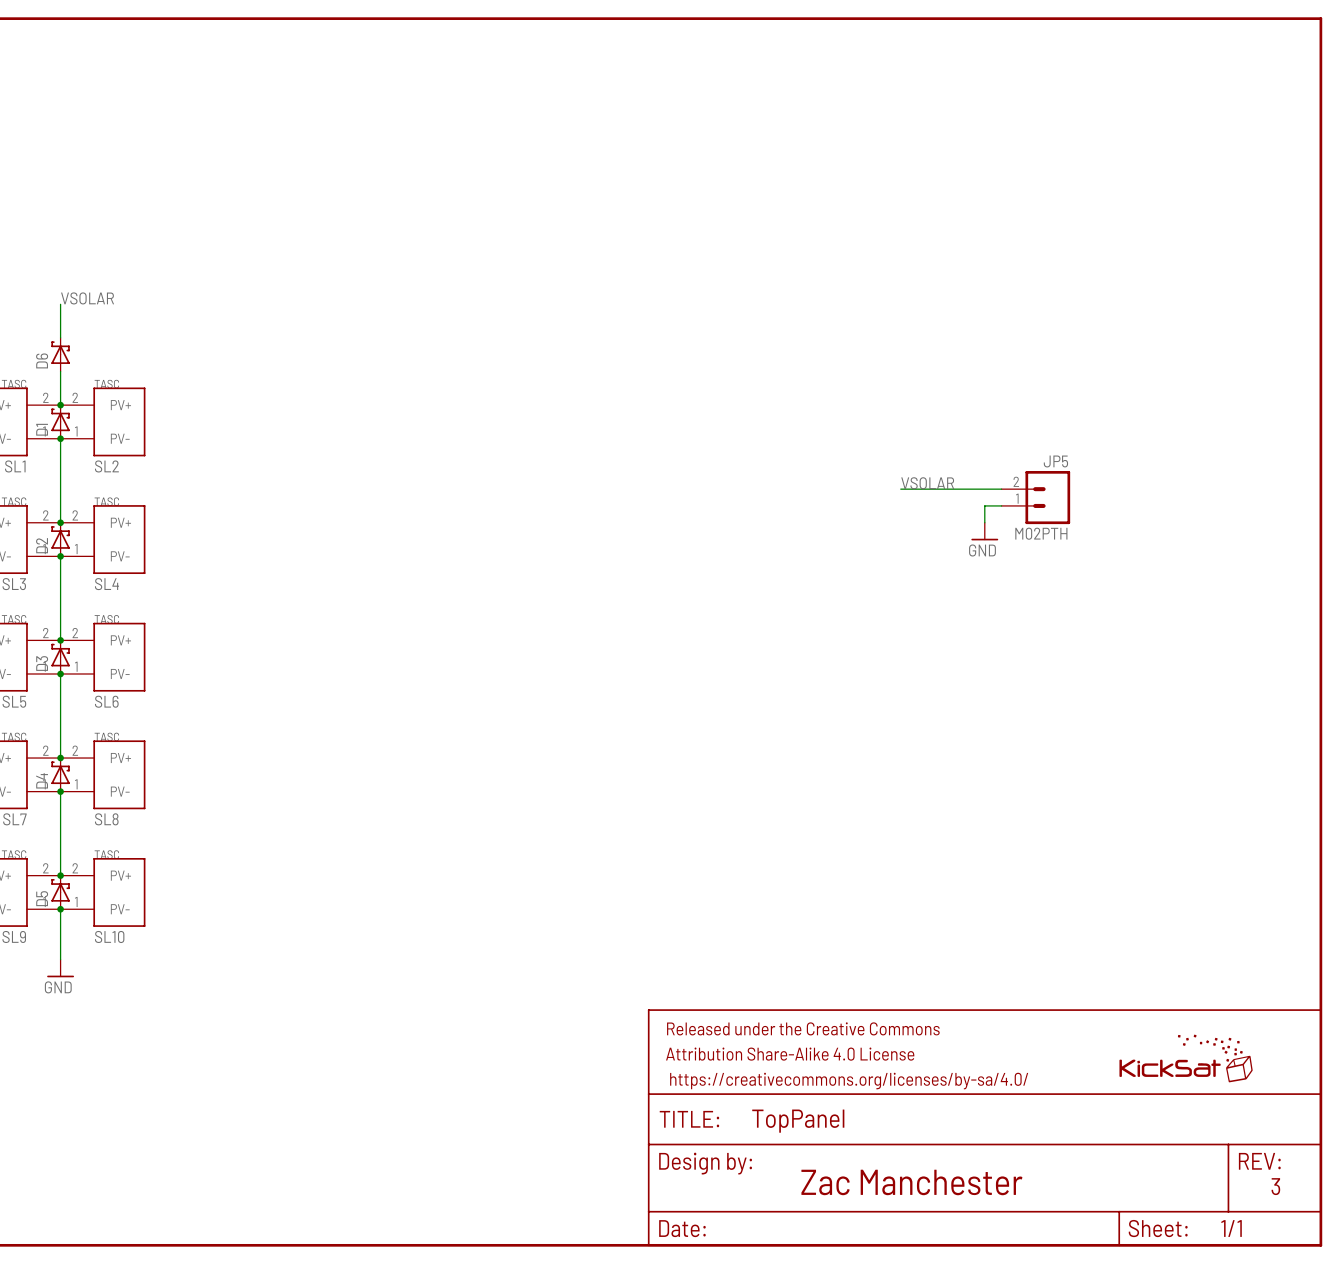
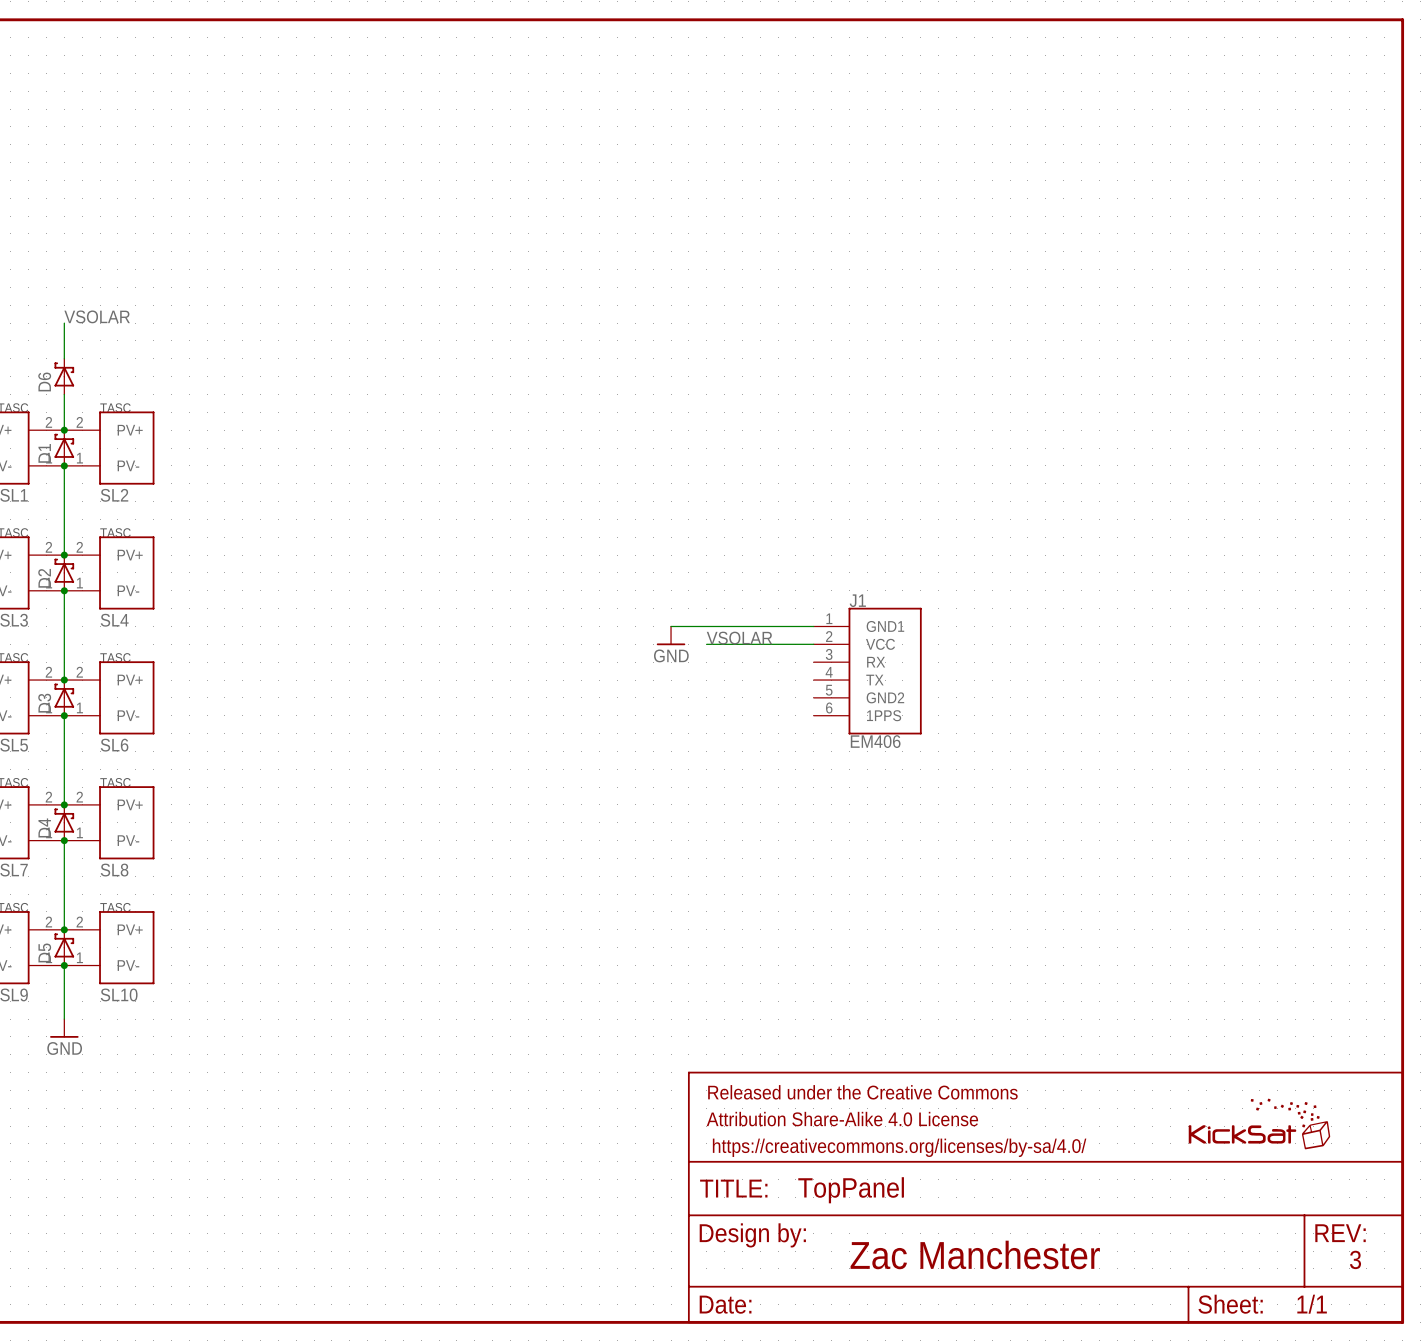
label: VSOLAR (927, 483) -> none
wire: (900, 489) (1001, 489) -> none
JP5: M02PTH (1035, 497) -> none
wire: (1001, 505) (984, 505) (984, 522) -> none
power symbol: GND (984, 531) -> none
wire: none -> (671, 626) (813, 626)
power symbol: none -> GND (671, 635)
label: none -> VSOLAR (739, 638)
wire: none -> (706, 644) (813, 644)
J1: none -> EM406 (867, 671)

